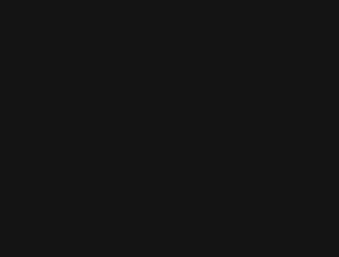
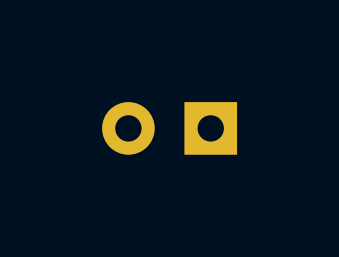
part: none -> (169, 128)

